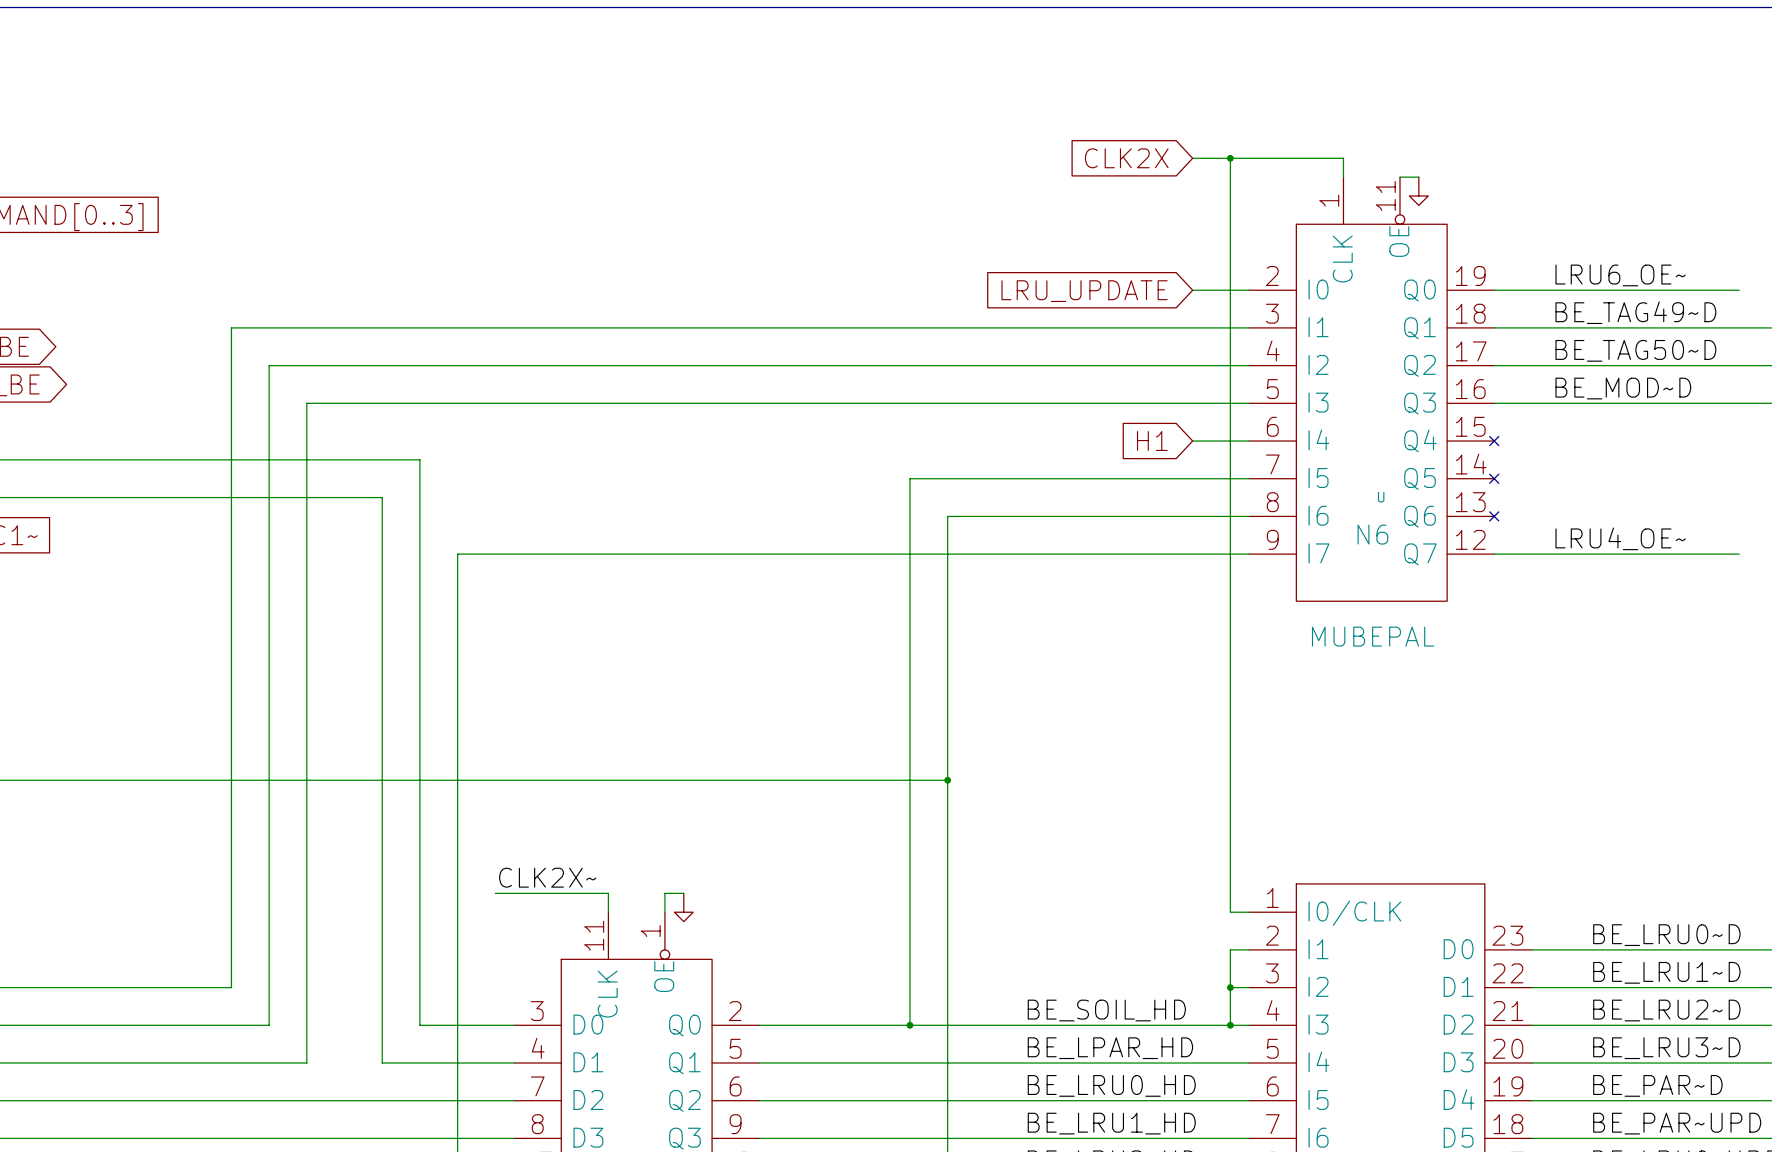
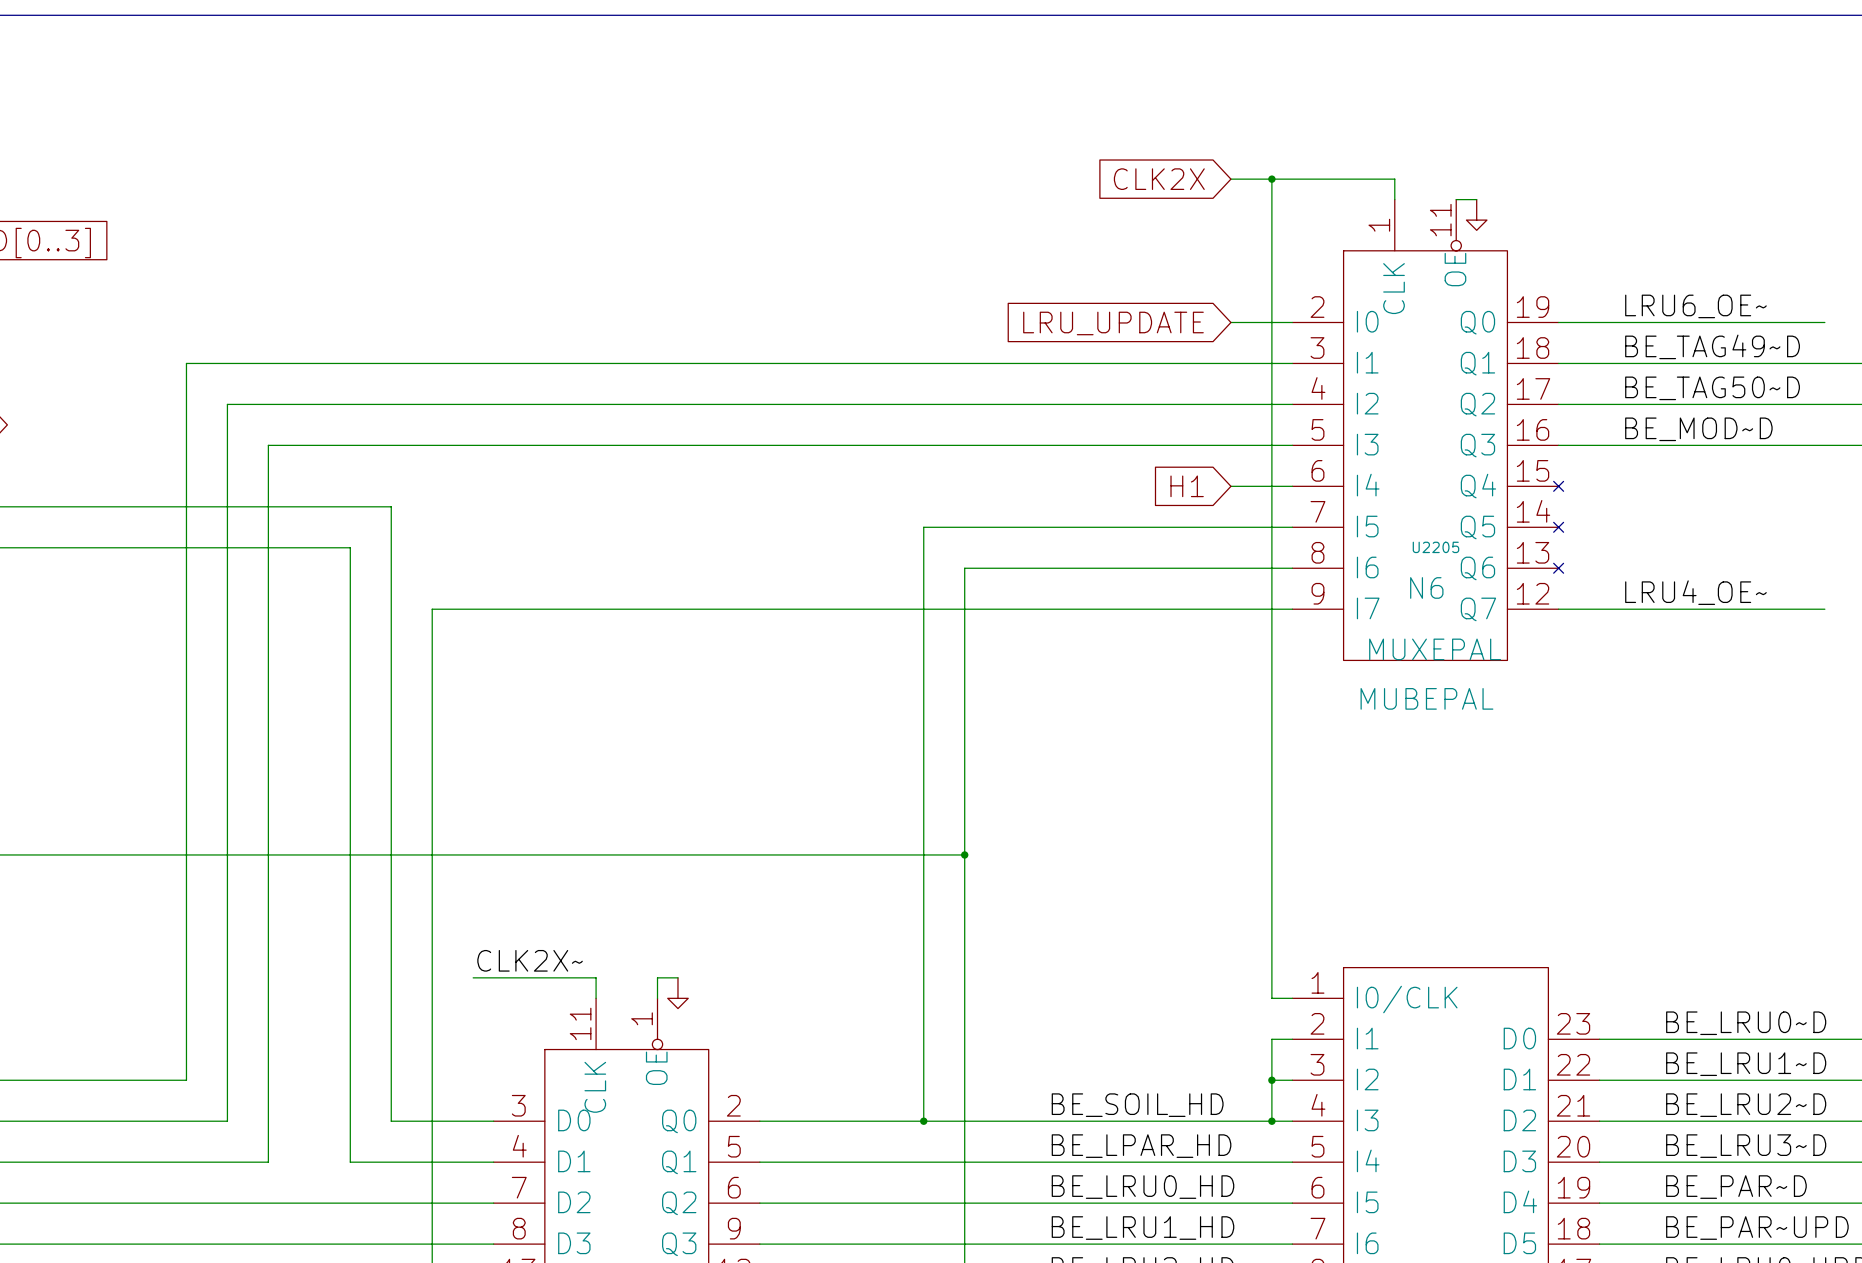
U name: U (1381, 497) -> U2205 (1435, 547)
U value: none -> MUXEPAL (1435, 649)

